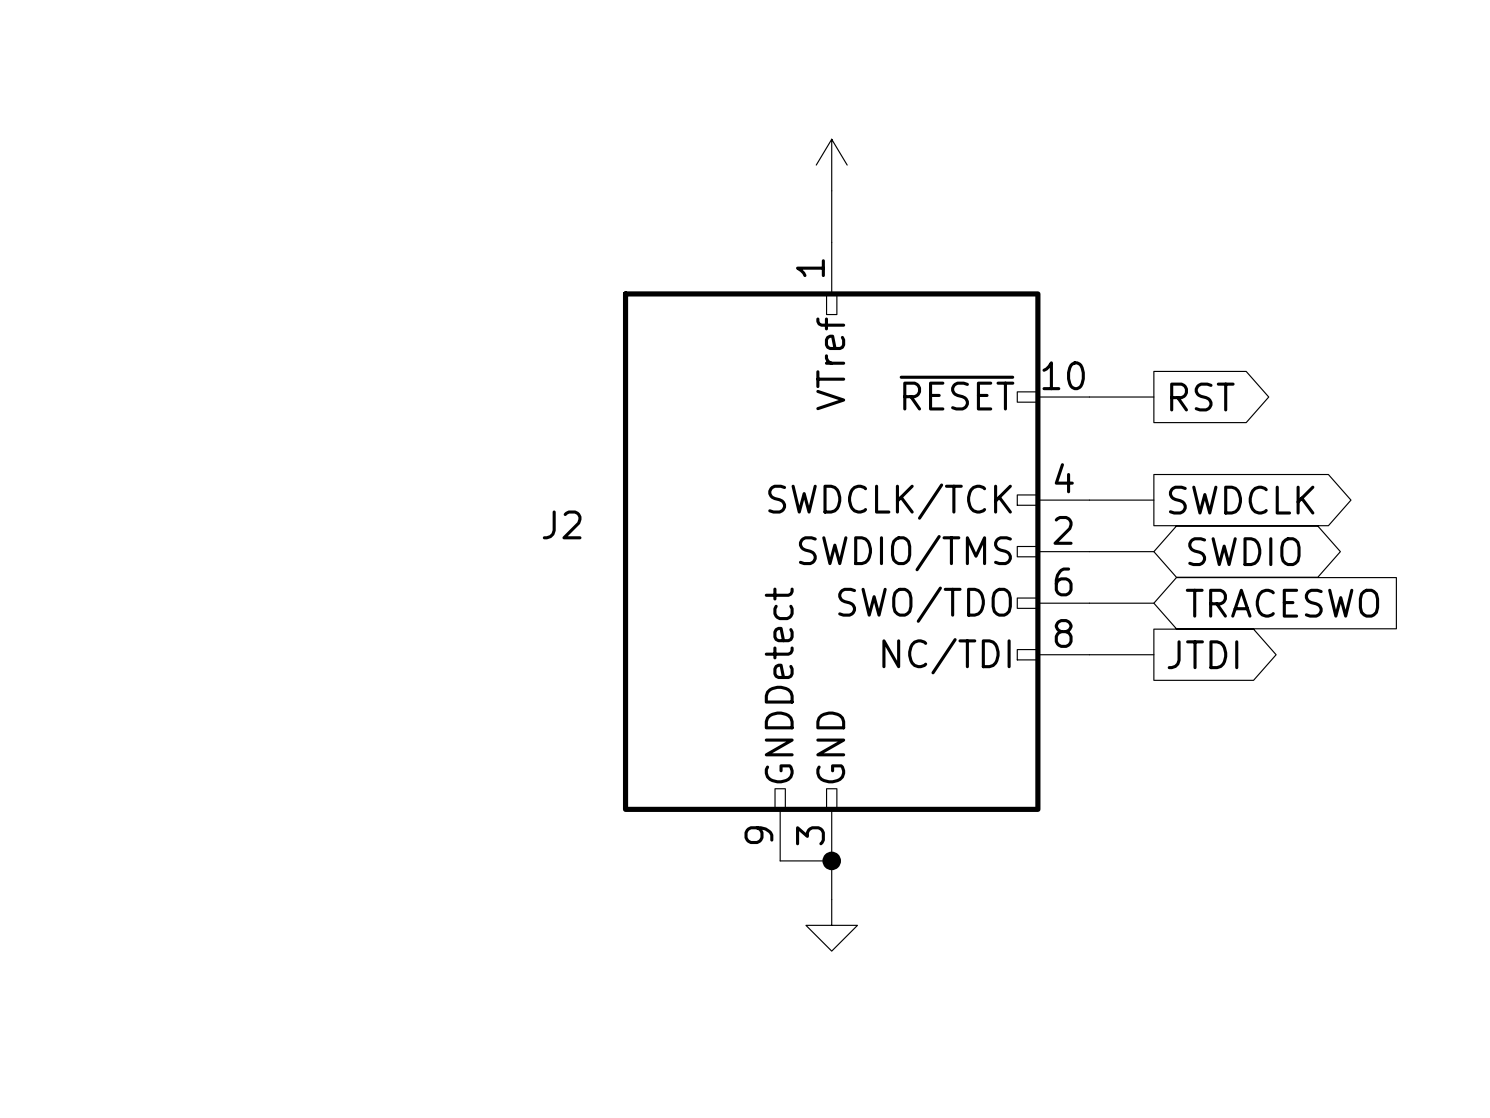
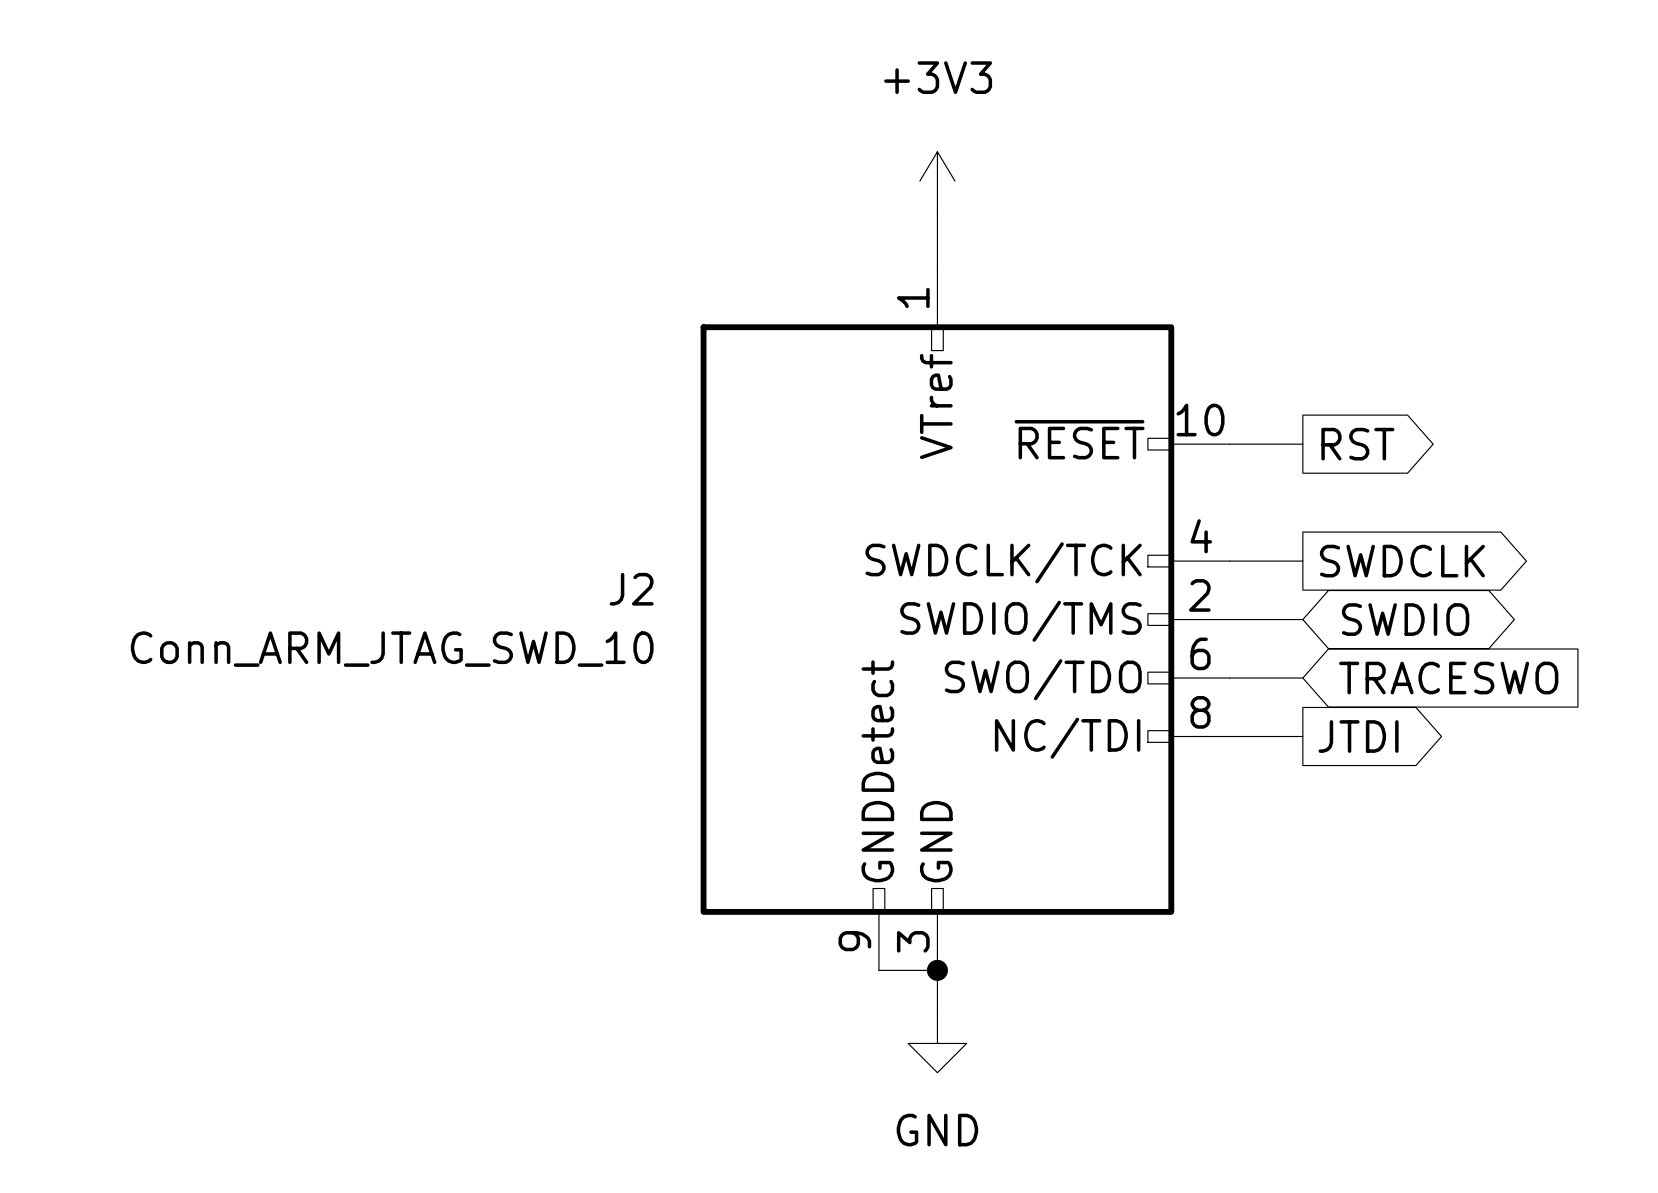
power symbol text: none -> +3V3 (938, 77)
J2 value: none -> Conn_ARM_JTAG_SWD_10 (392, 649)
power symbol text: none -> GND (937, 1130)

